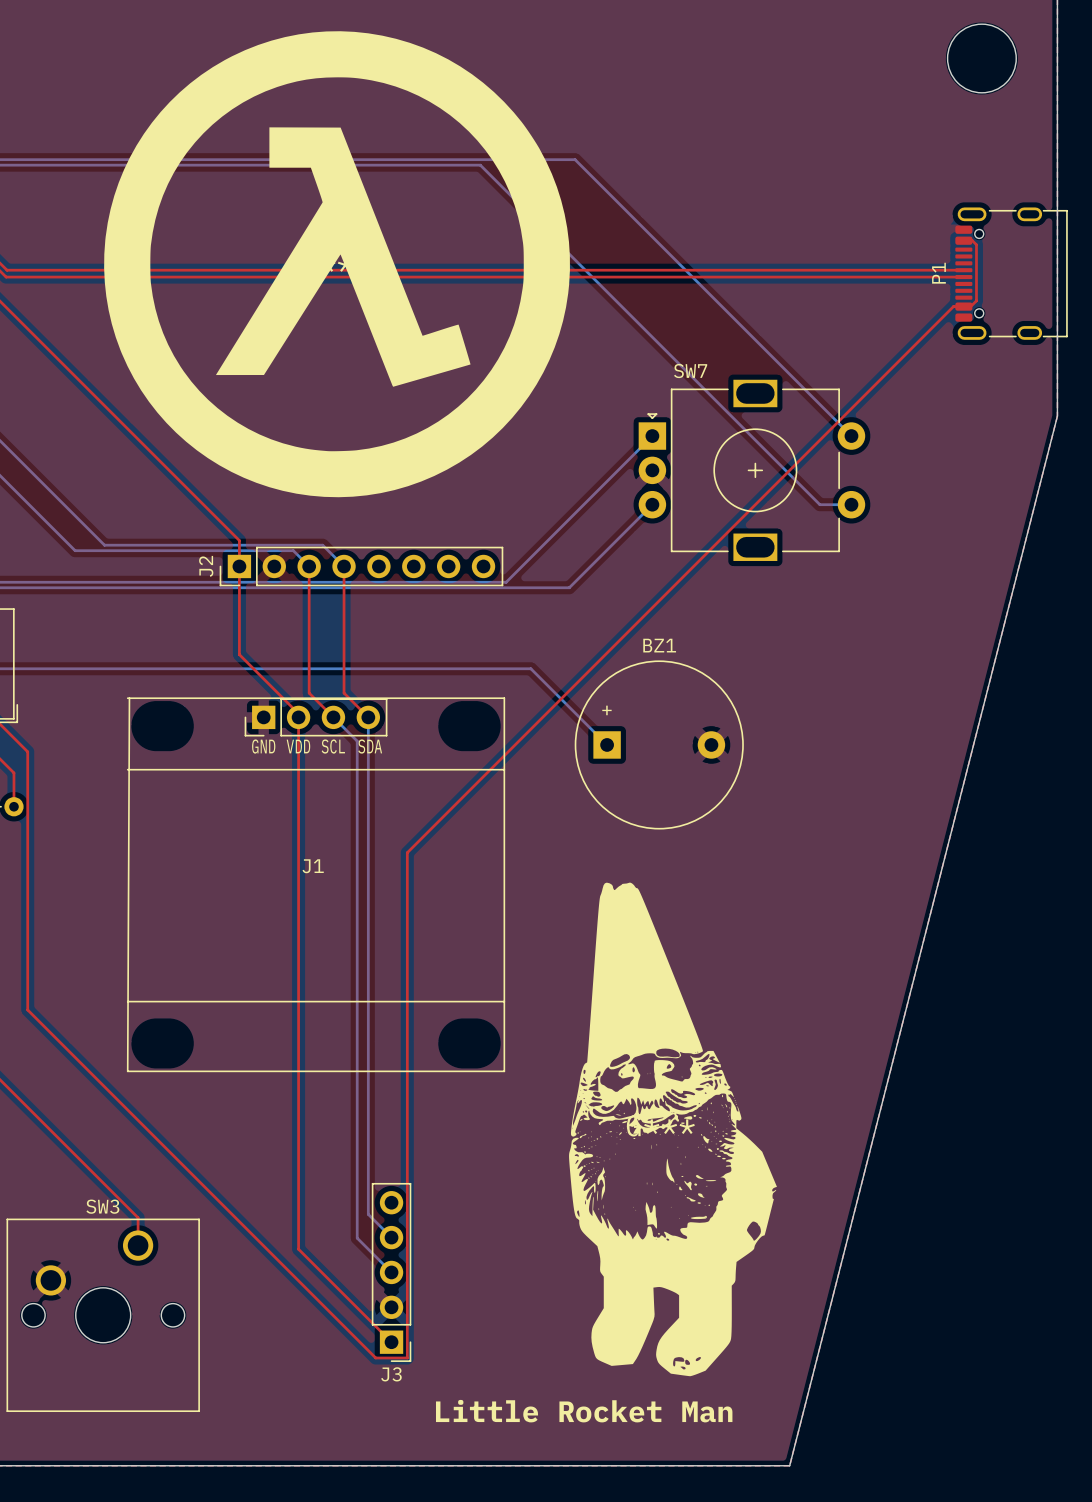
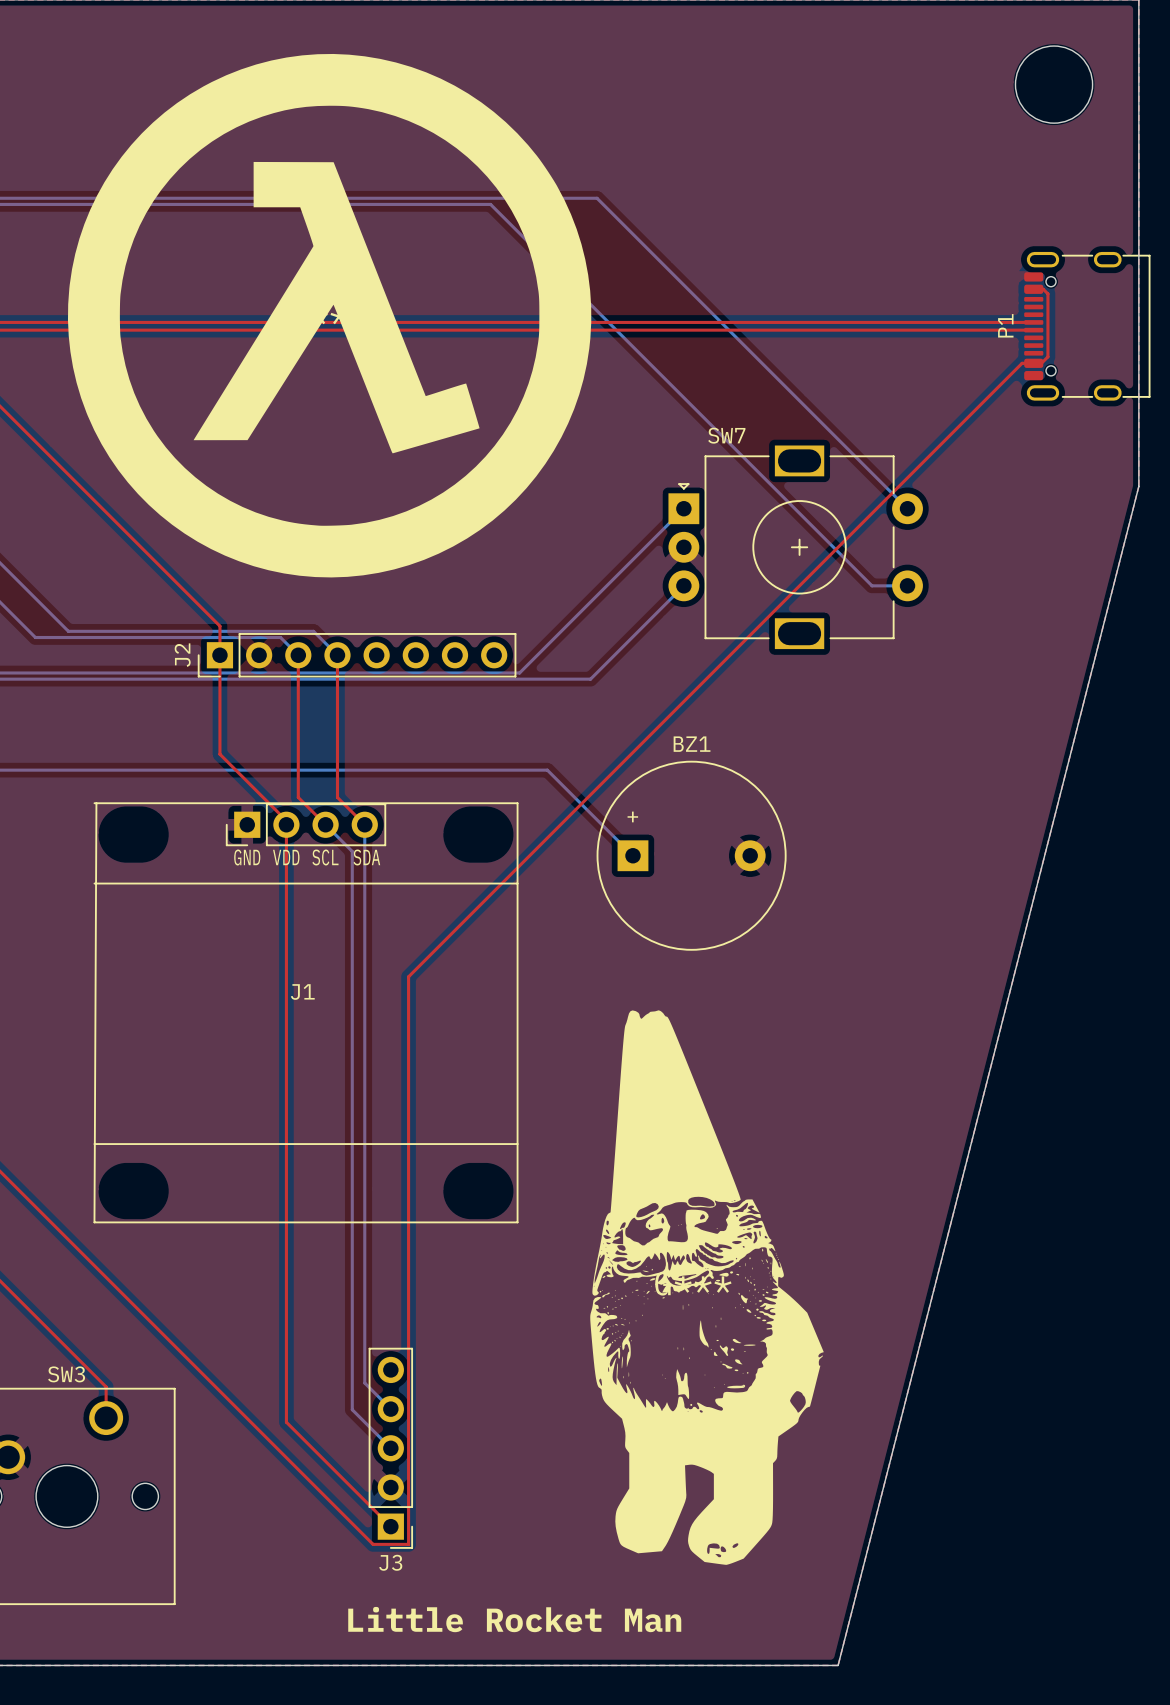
text position: Little Rocket Man (584, 1411) -> Little Rocket Man (514, 1619)

